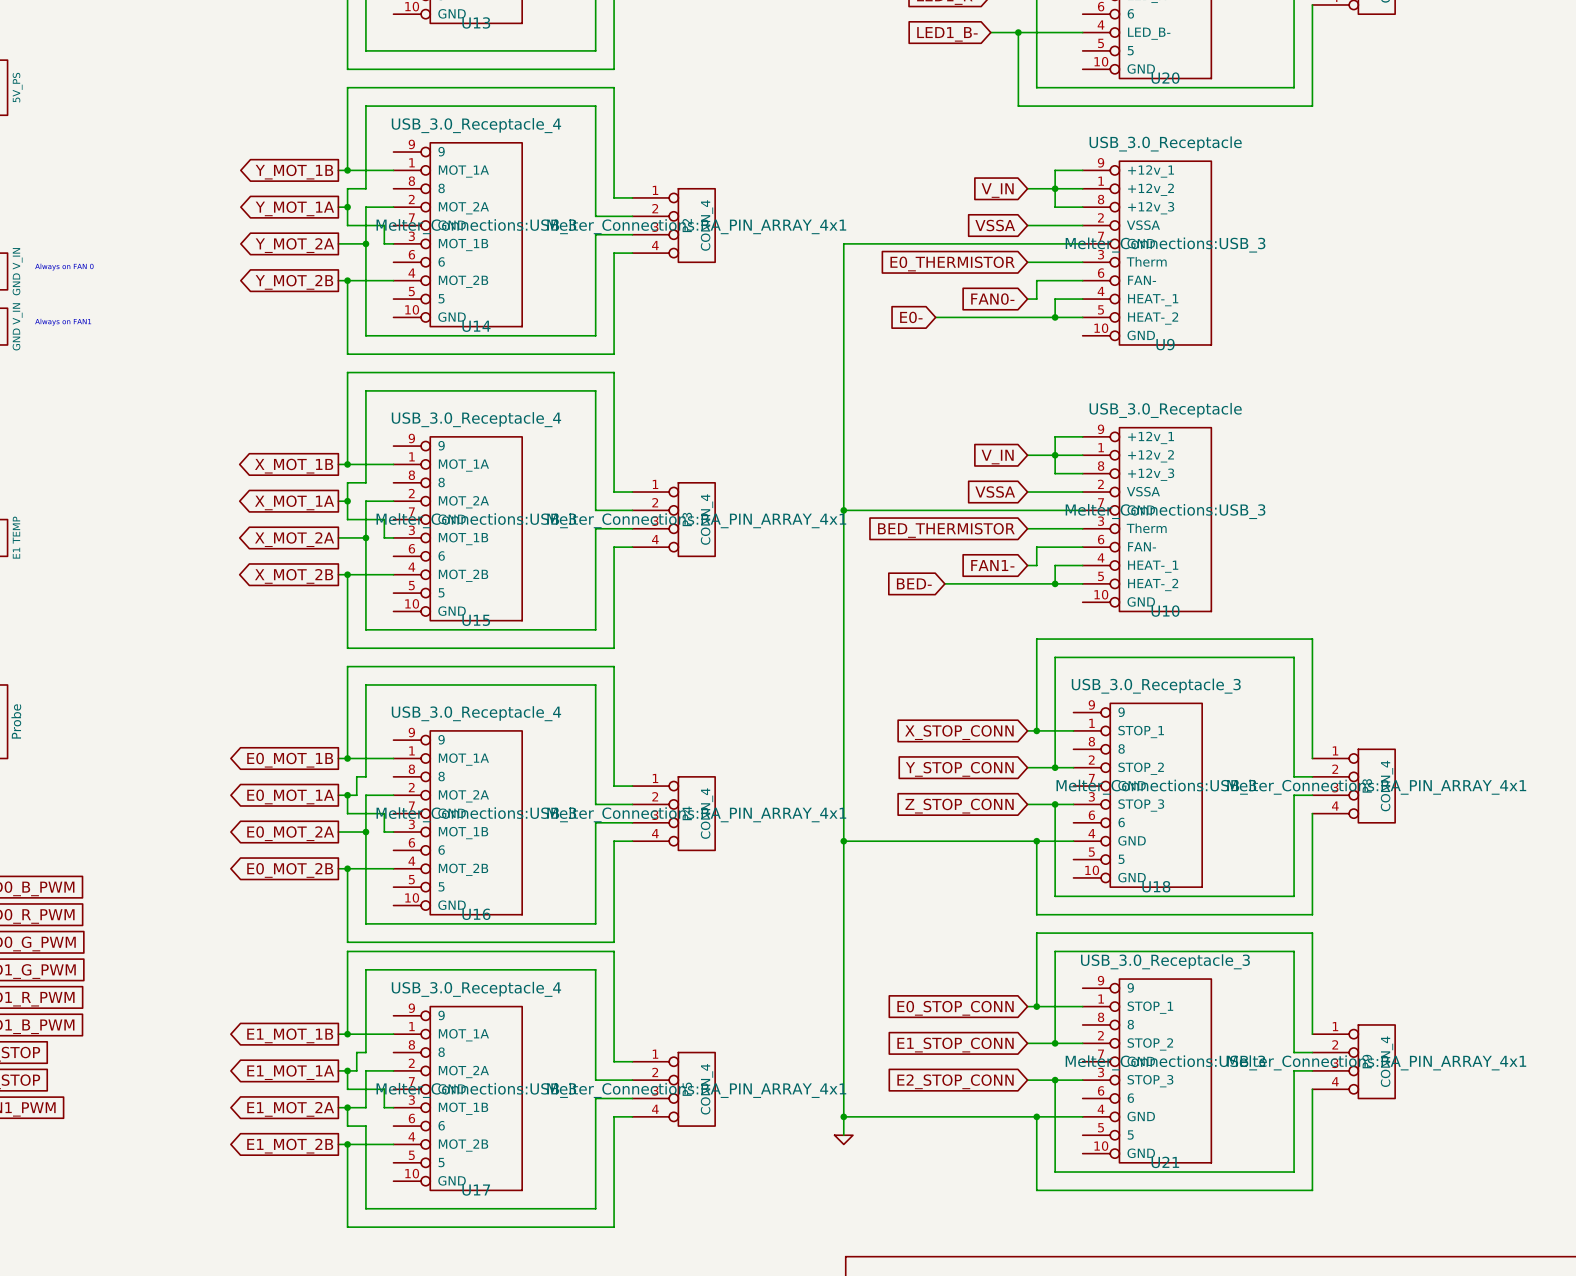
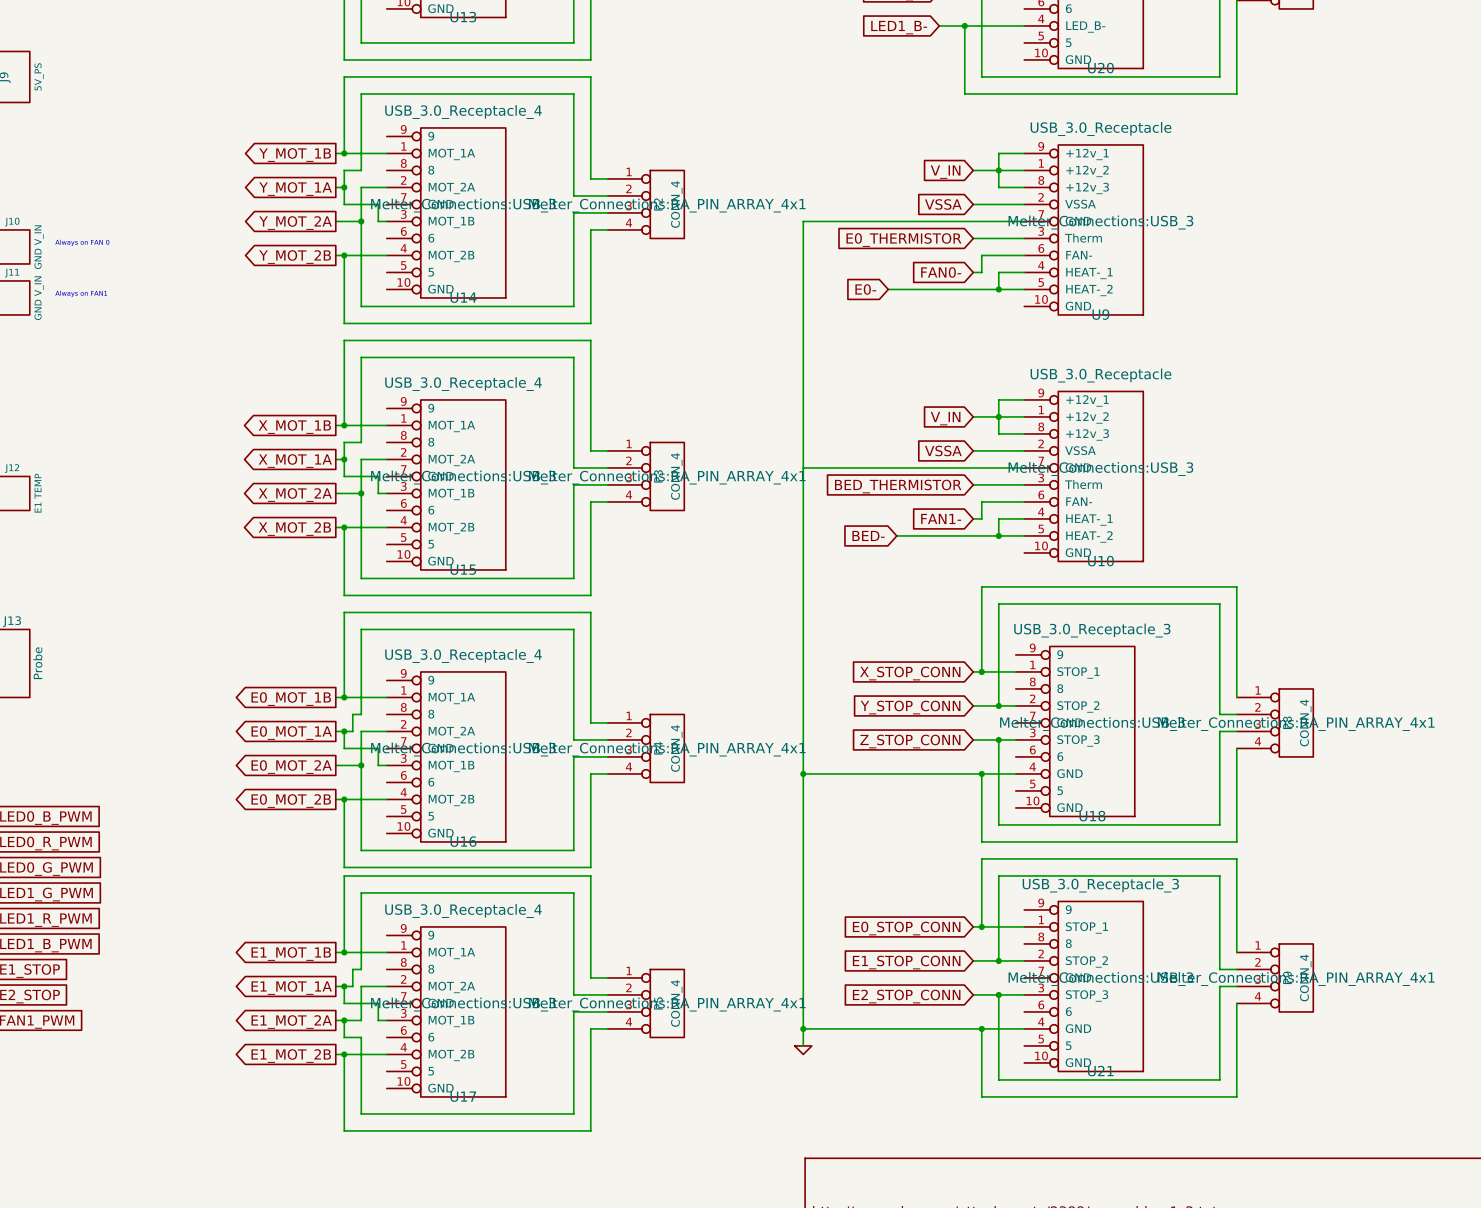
junction: (843, 510) -> none

